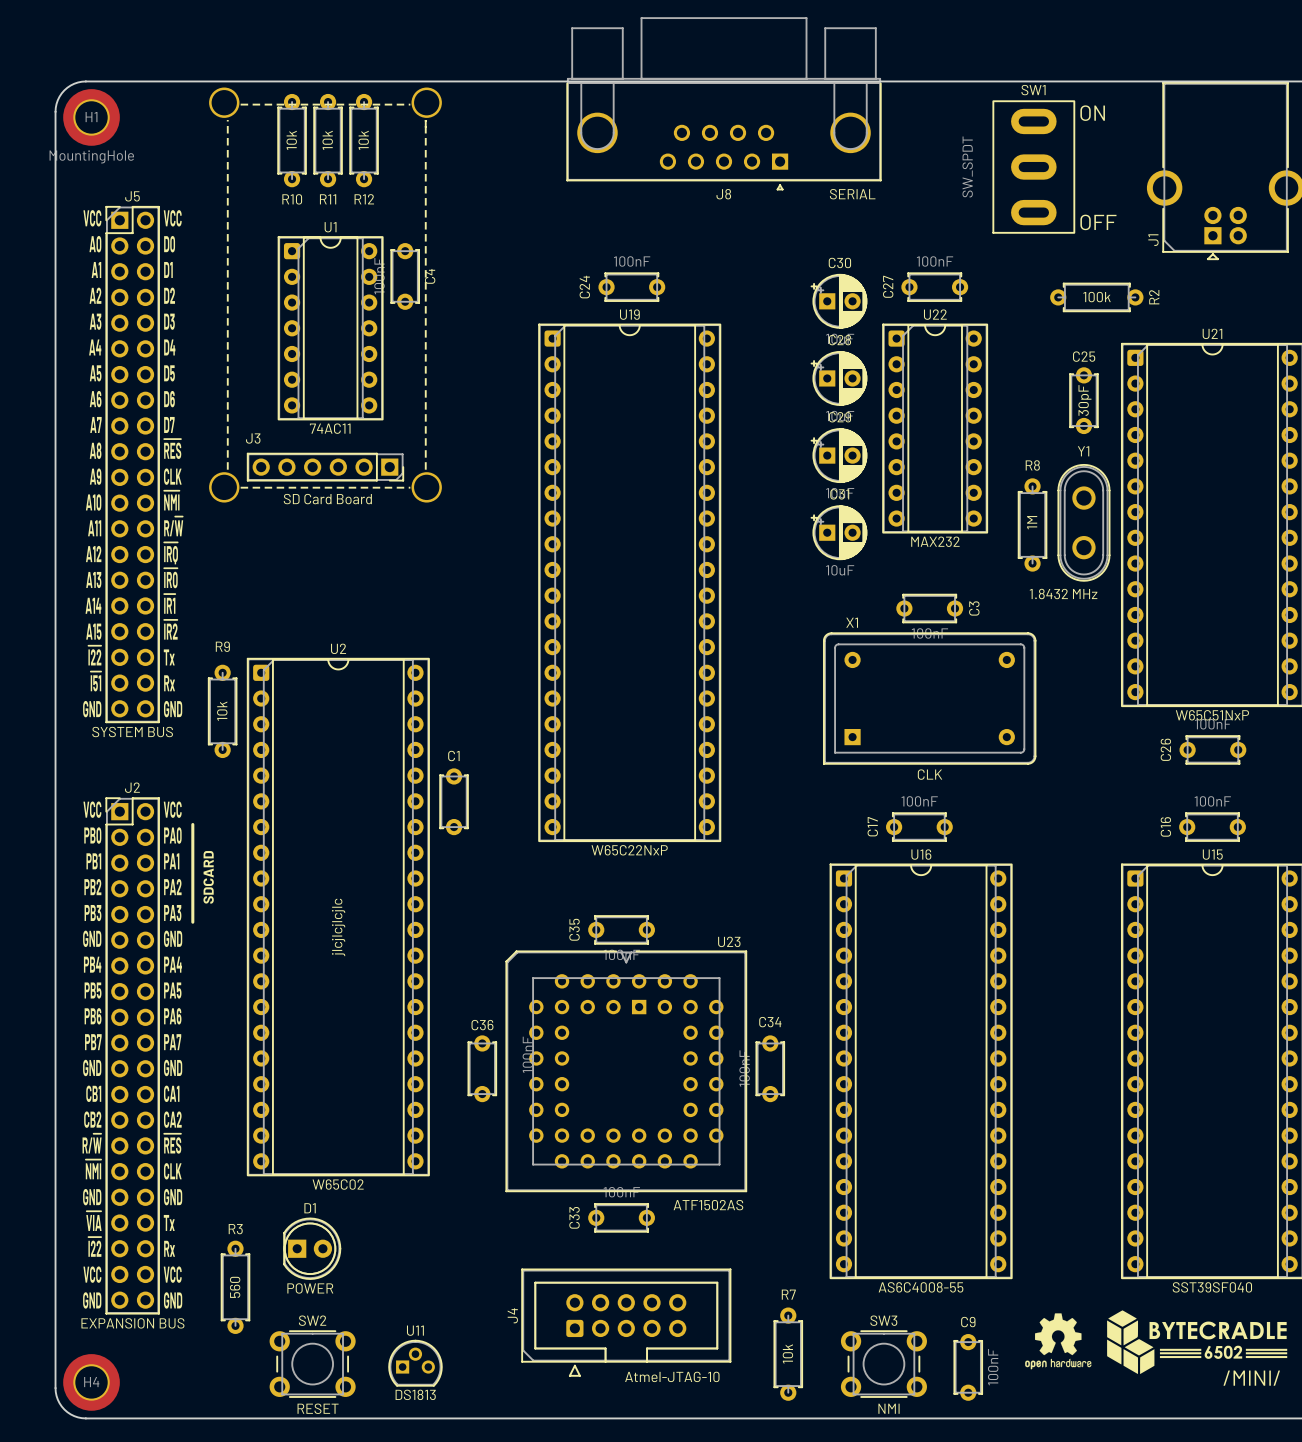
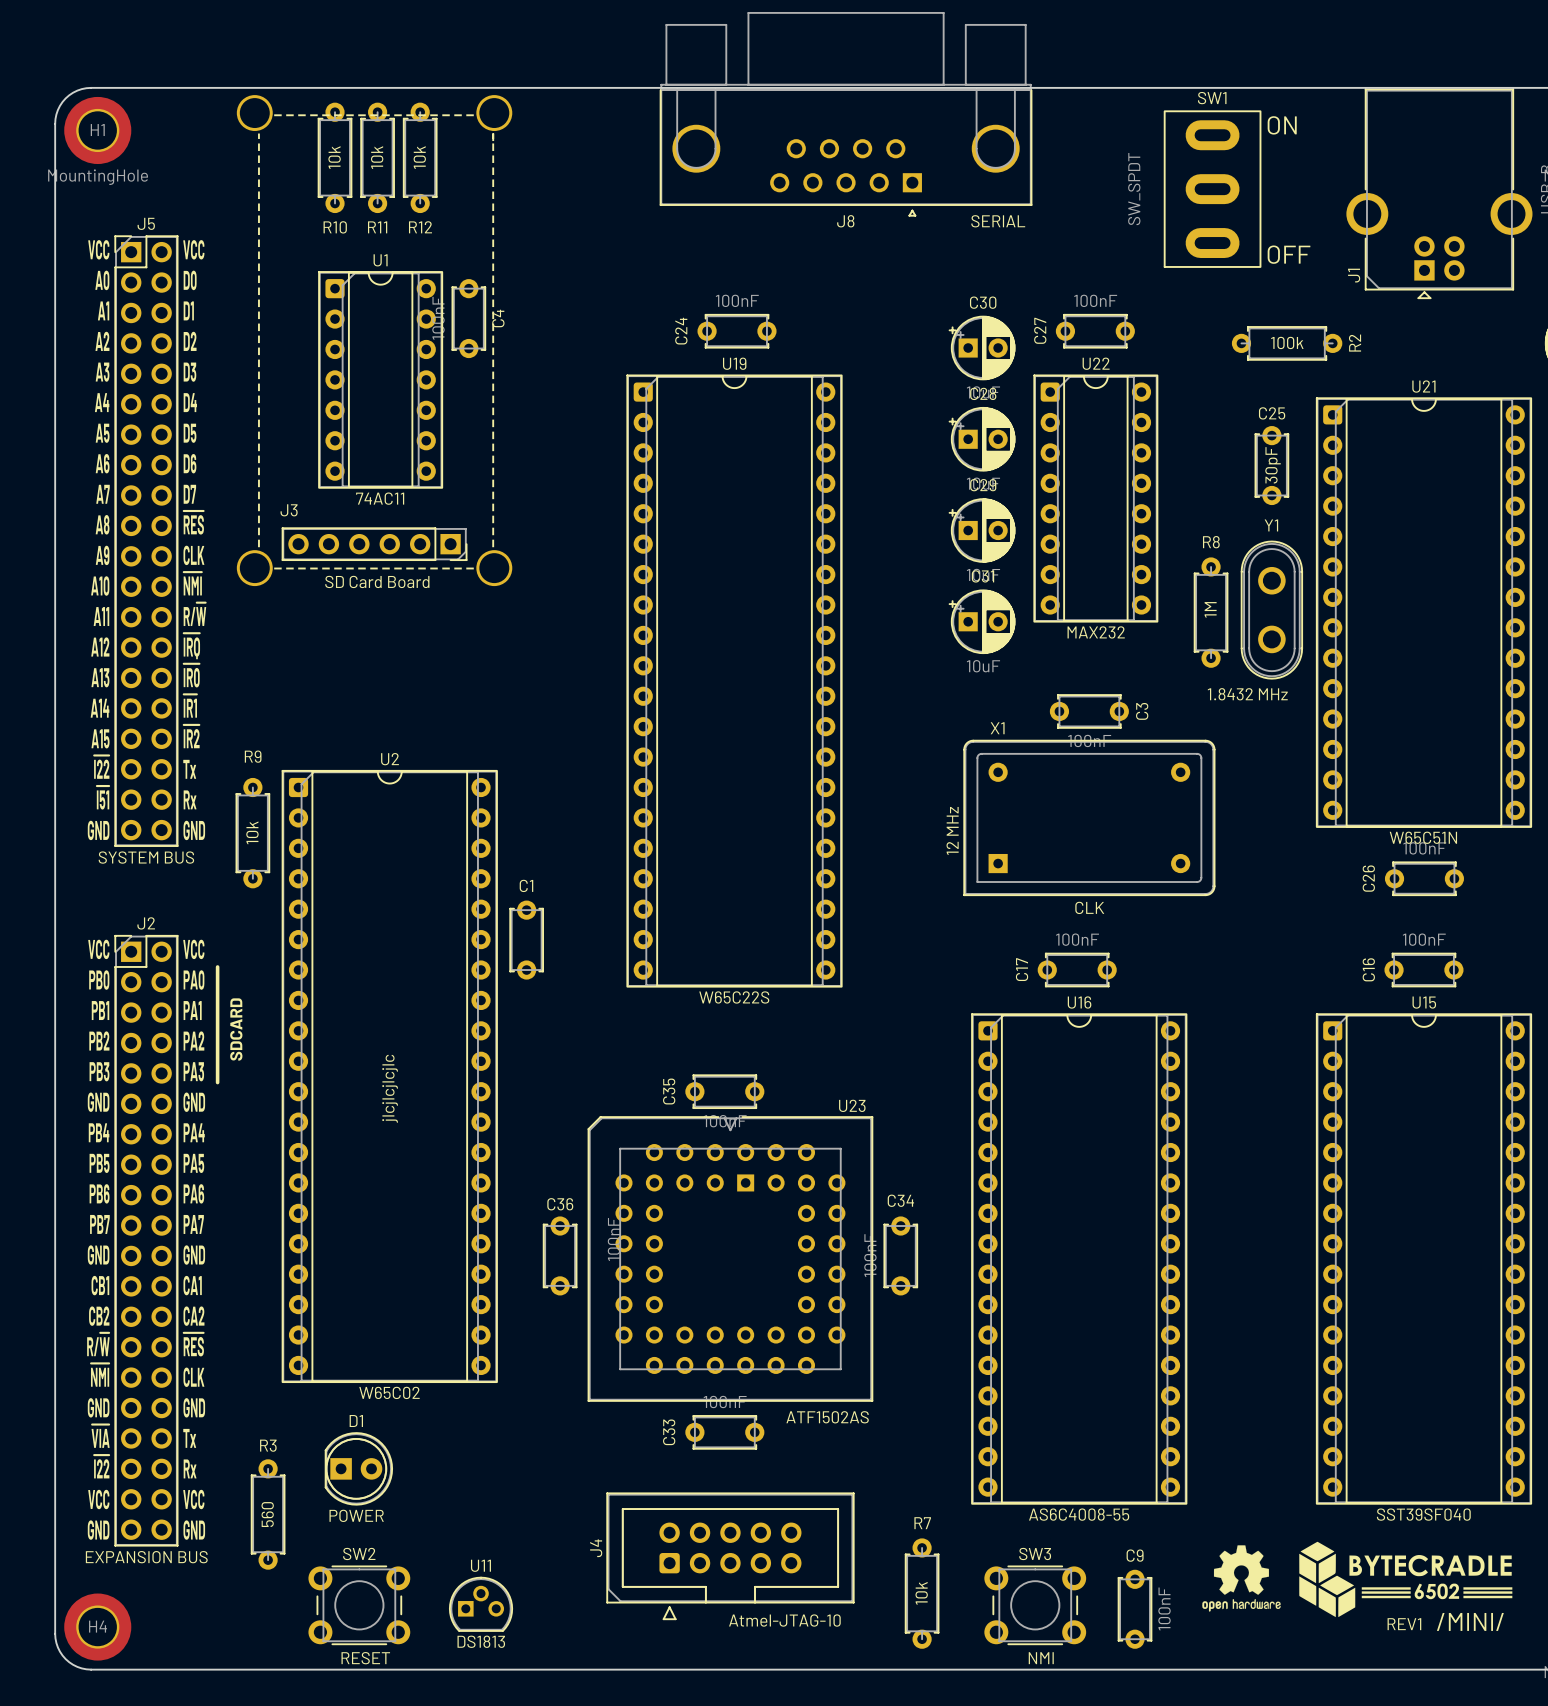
text: none -> 12 MHz (952, 830)
U21 value: W65C51NxP (1212, 715) -> W65C51N (1423, 837)
U19 value: W65C22NxP (629, 850) -> W65C22S (734, 997)
text: none -> REV1 (1404, 1624)

